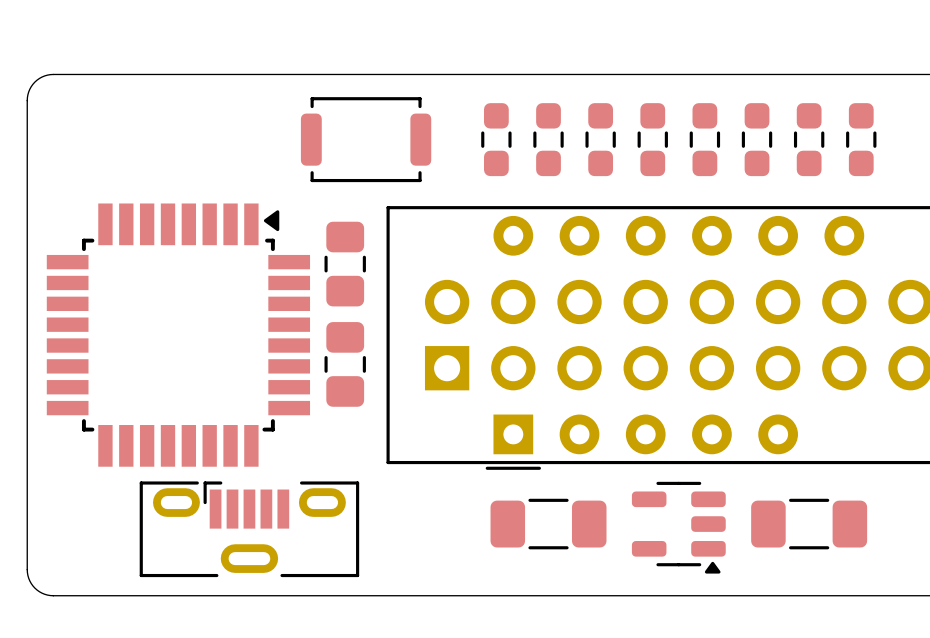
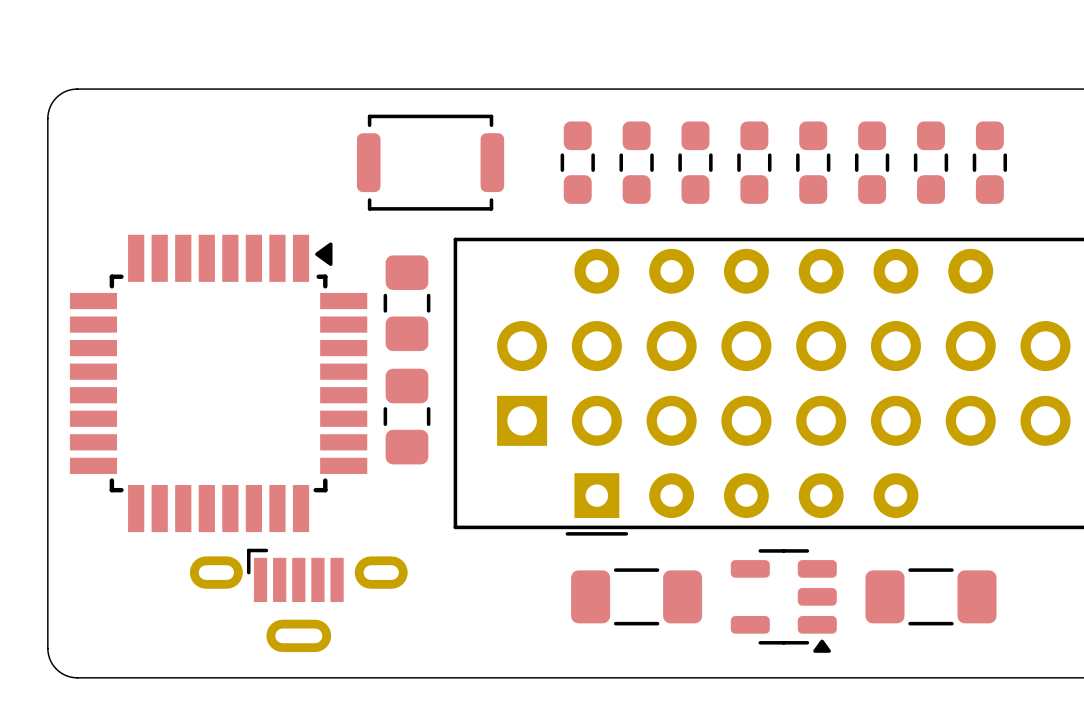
part footprint: [139, 481, 360, 578] -> [189, 548, 408, 653]

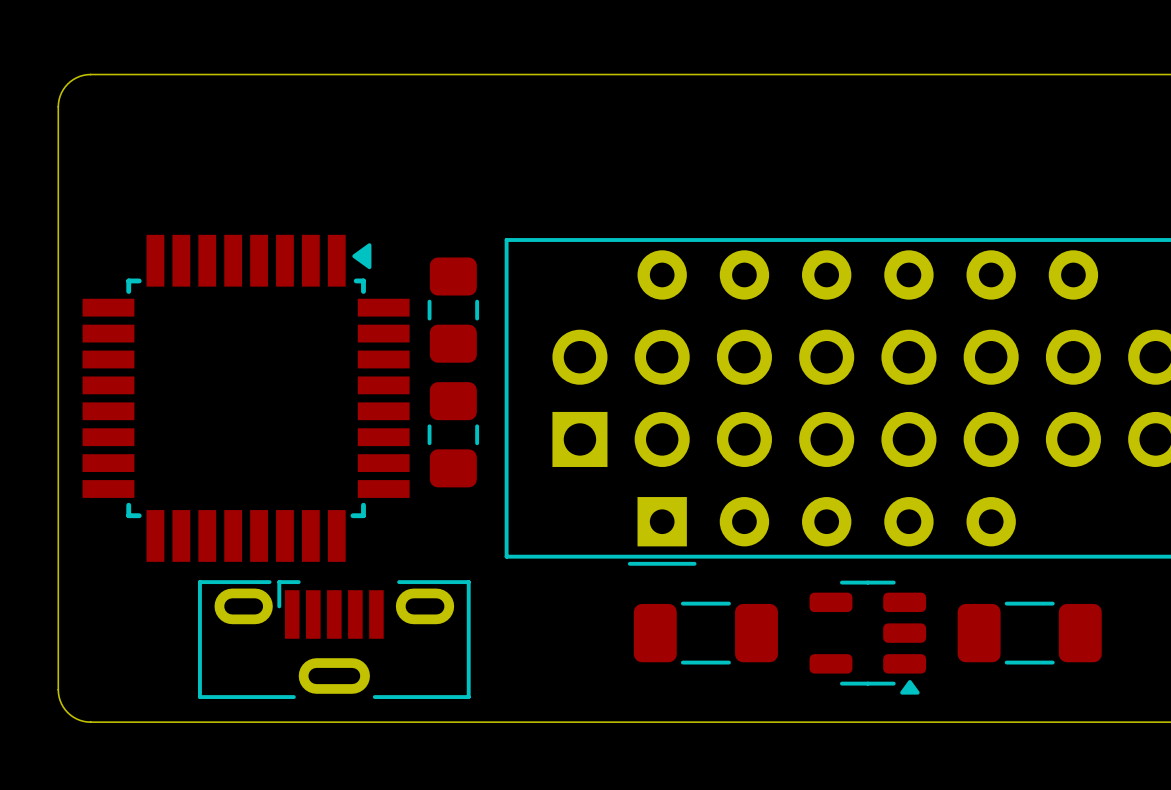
part: (430, 162) -> none
part: (577, 162) -> none
part: (636, 162) -> none
part: (695, 162) -> none
part: (754, 162) -> none
part: (813, 162) -> none
part: (872, 162) -> none
part: (930, 162) -> none
part: (989, 162) -> none
part footprint: [189, 548, 408, 653] -> [198, 580, 471, 699]

